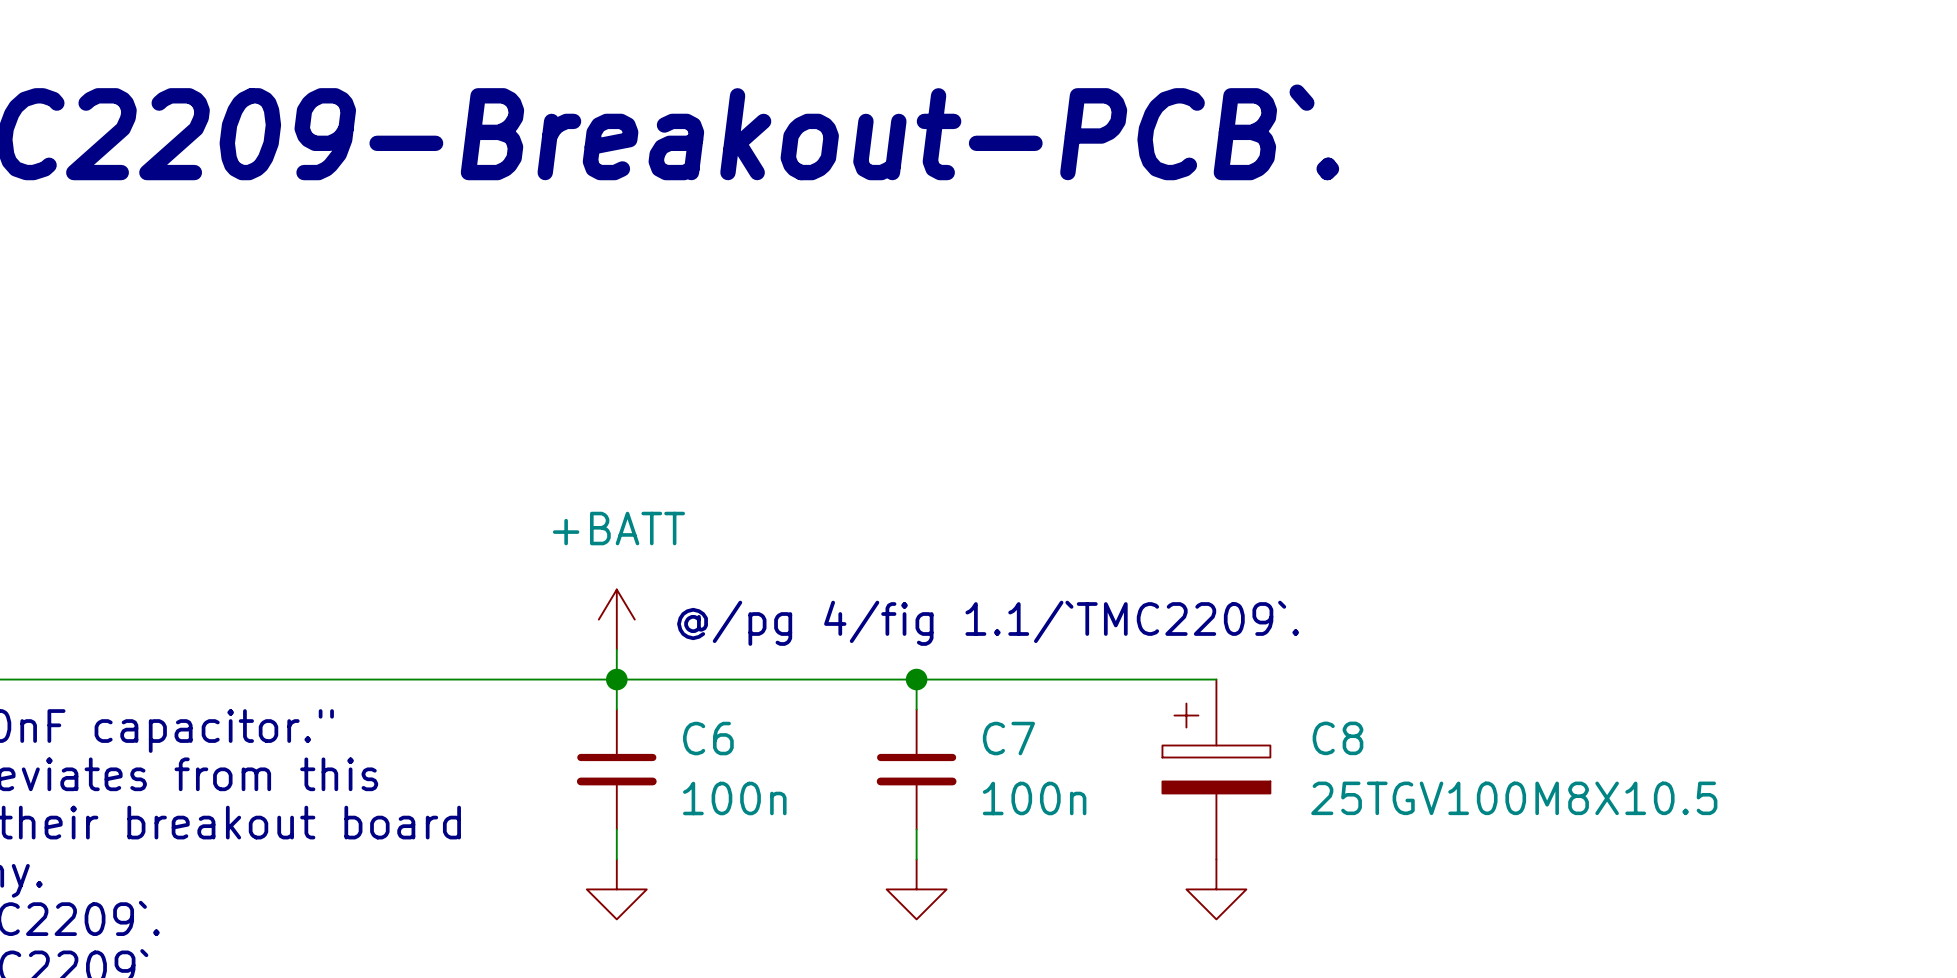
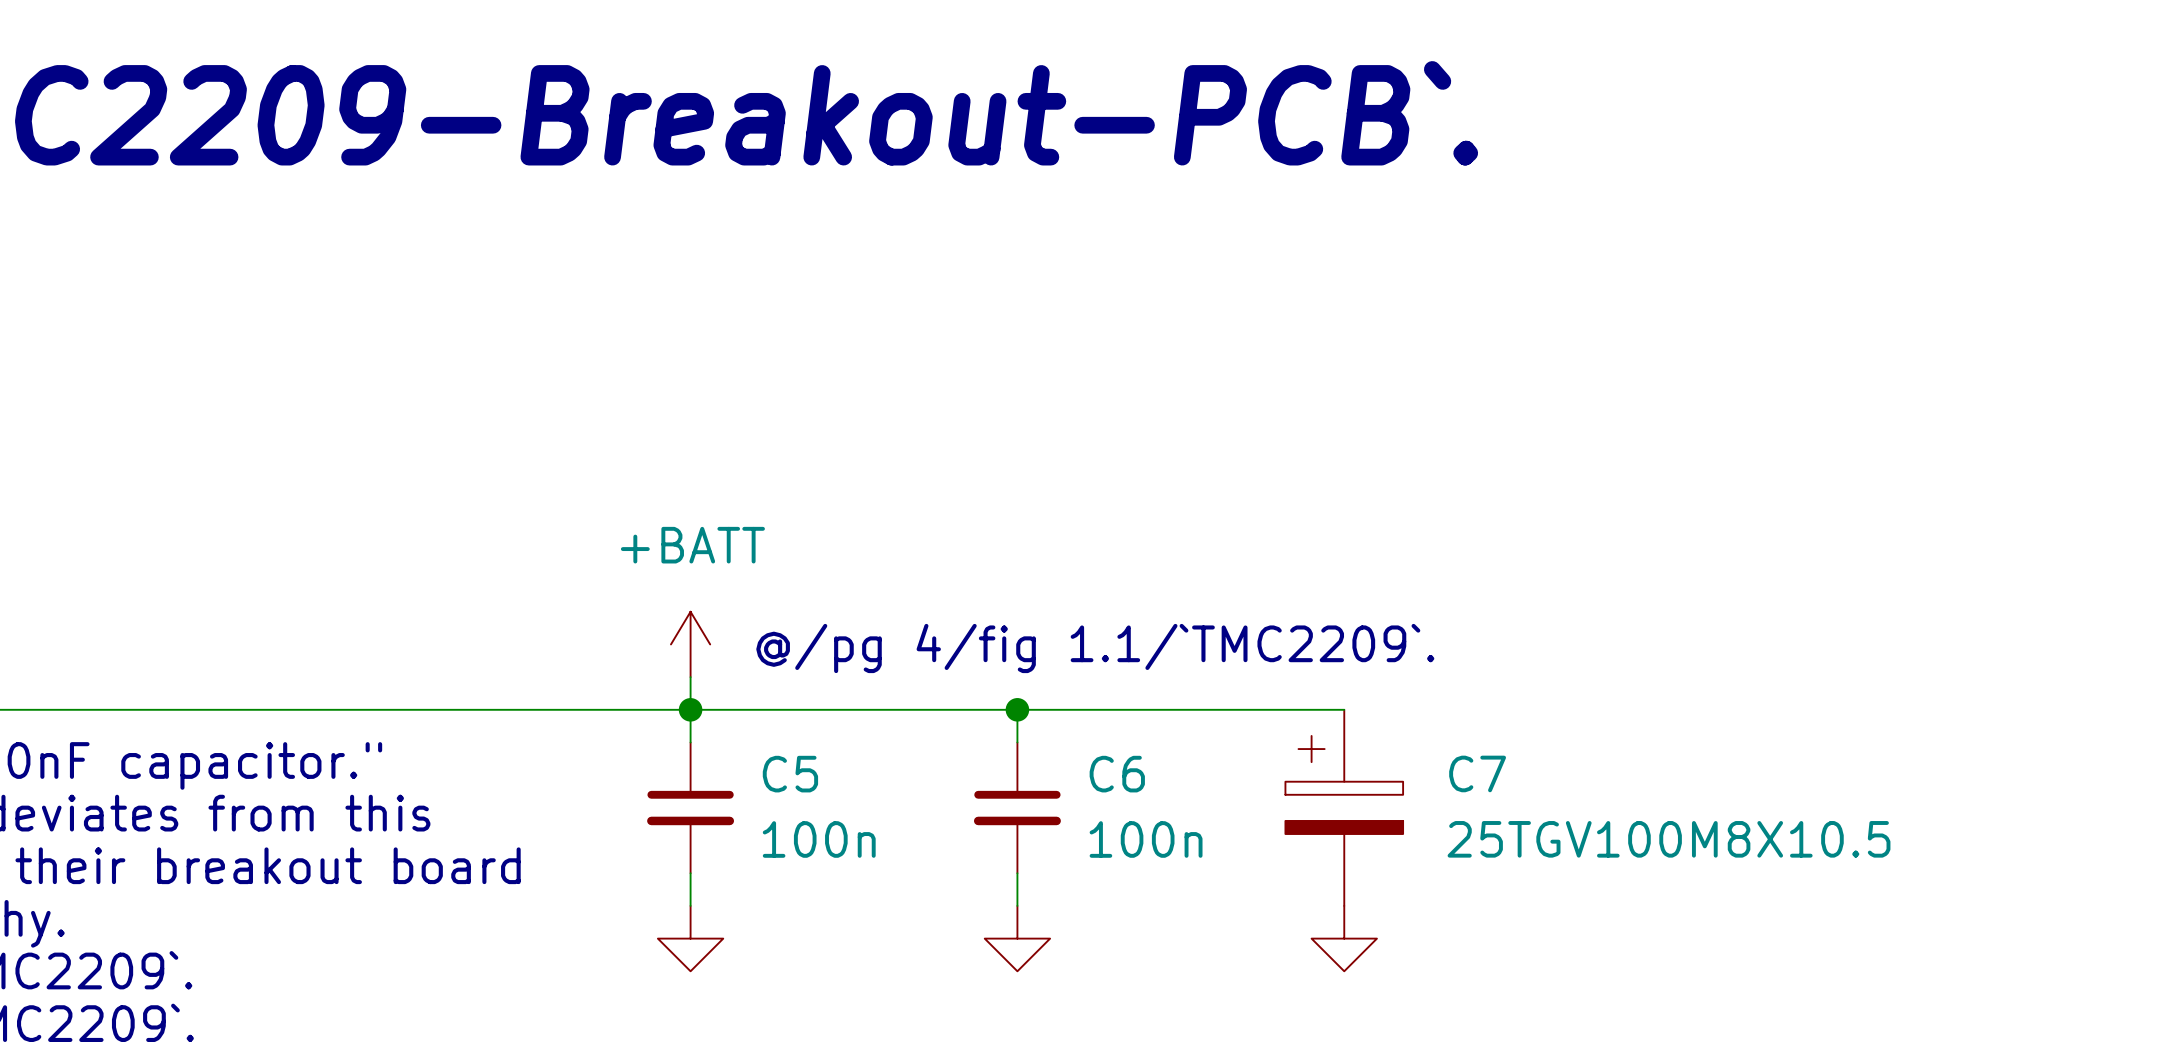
C6 name: C6 (708, 738) -> C5 (790, 774)
C7 name: C7 (1008, 738) -> C6 (1117, 774)
C8 name: C8 (1337, 738) -> C7 (1477, 773)

